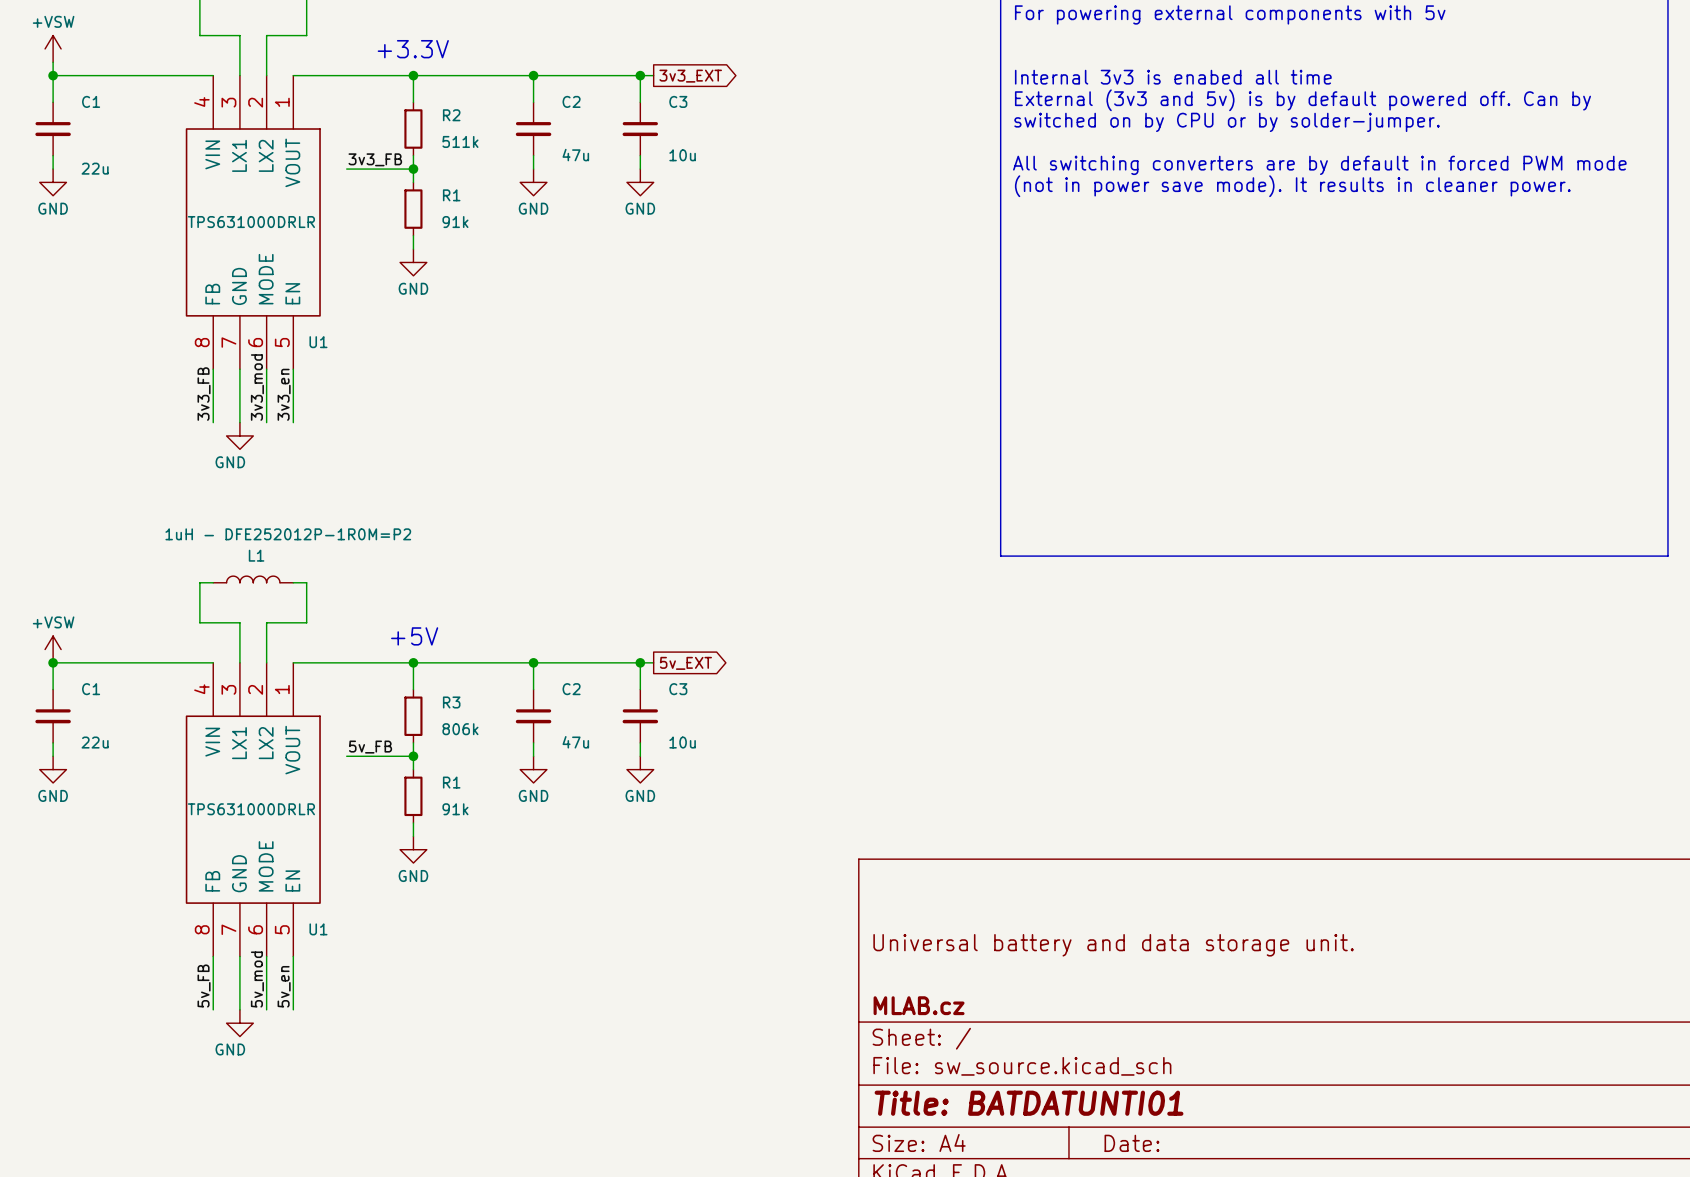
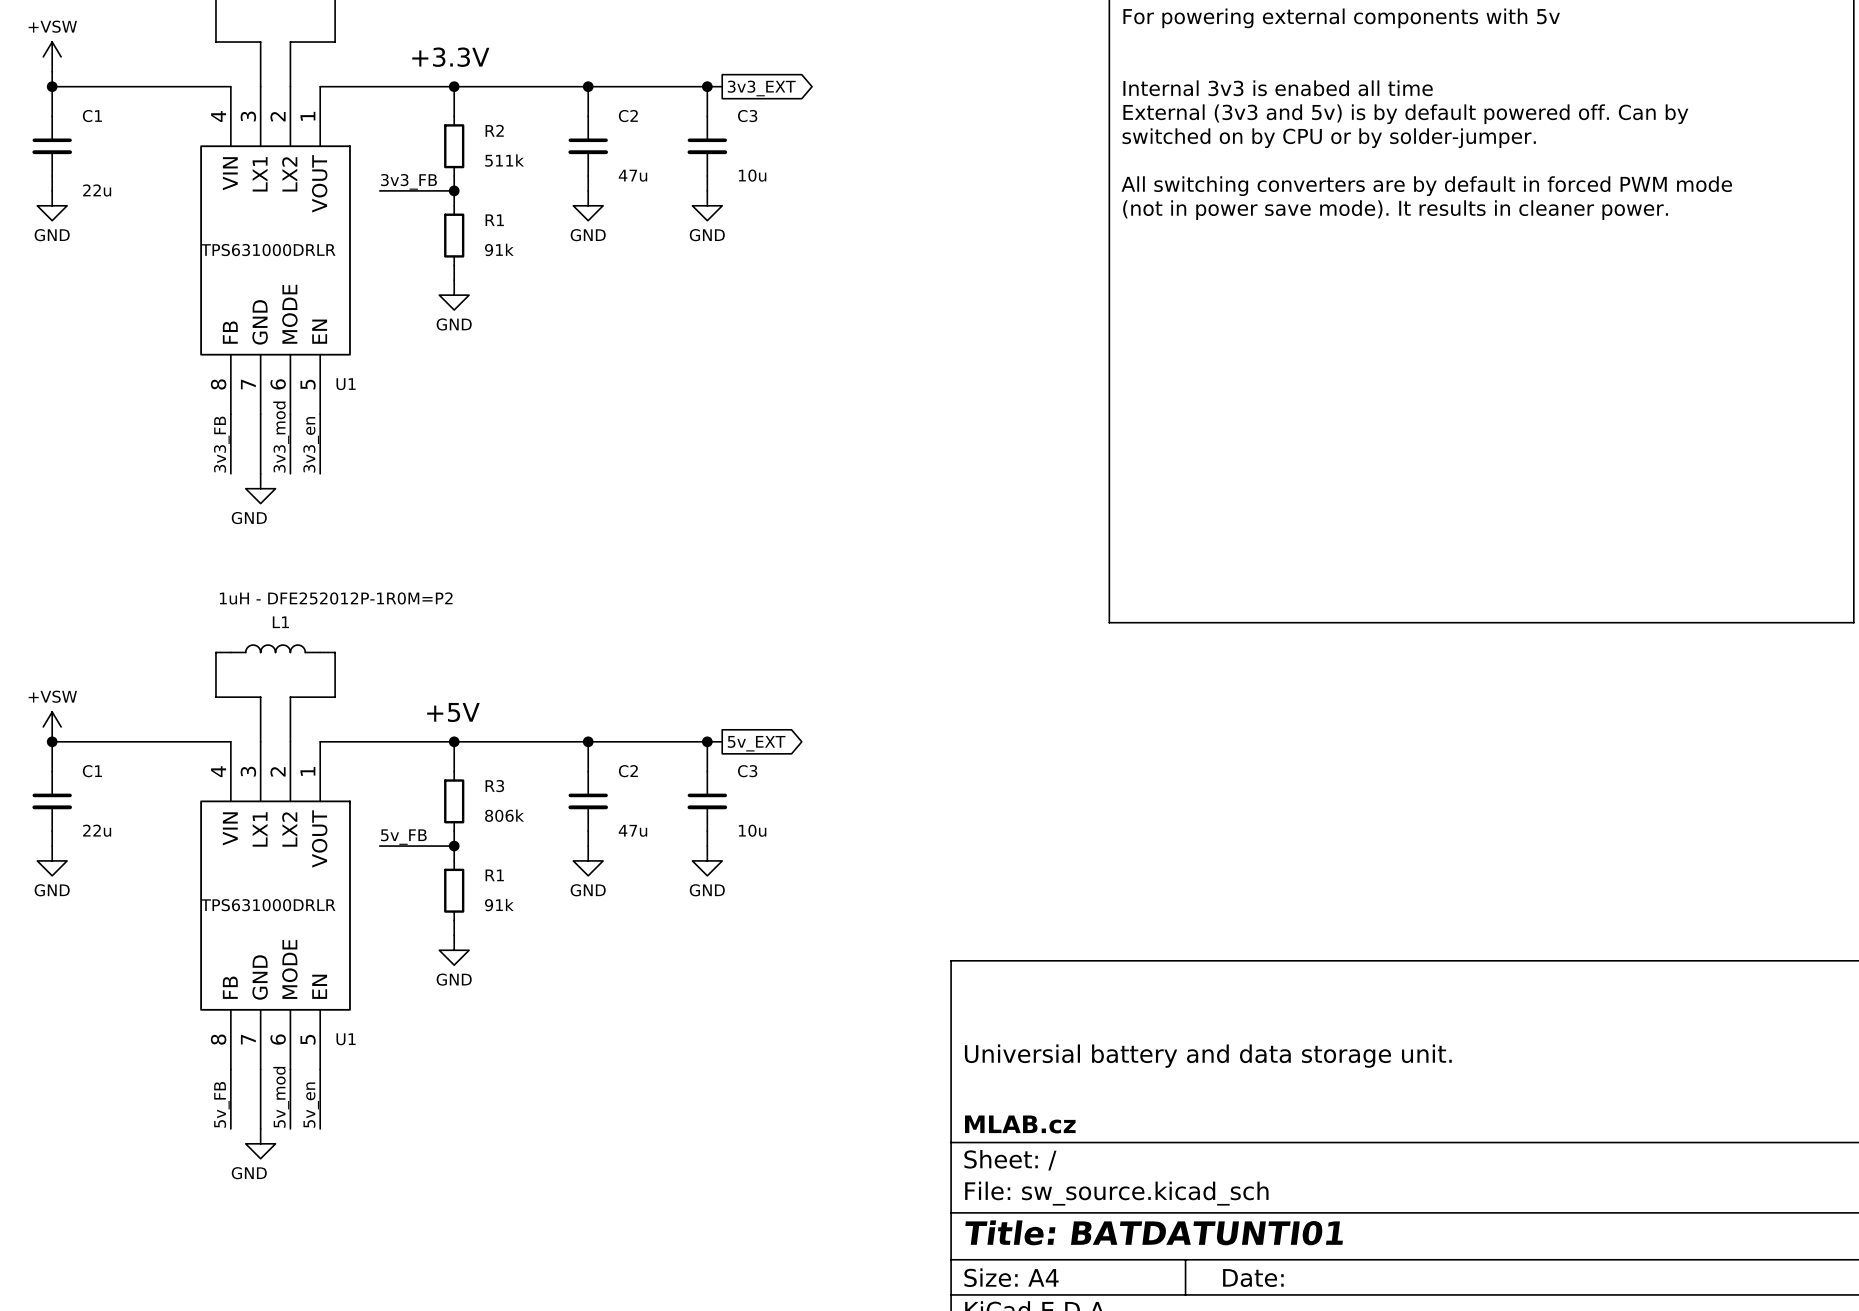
title block: Universal battery and data storage unit. (1113, 945) -> Universial battery and data storage unit. (1208, 1056)

